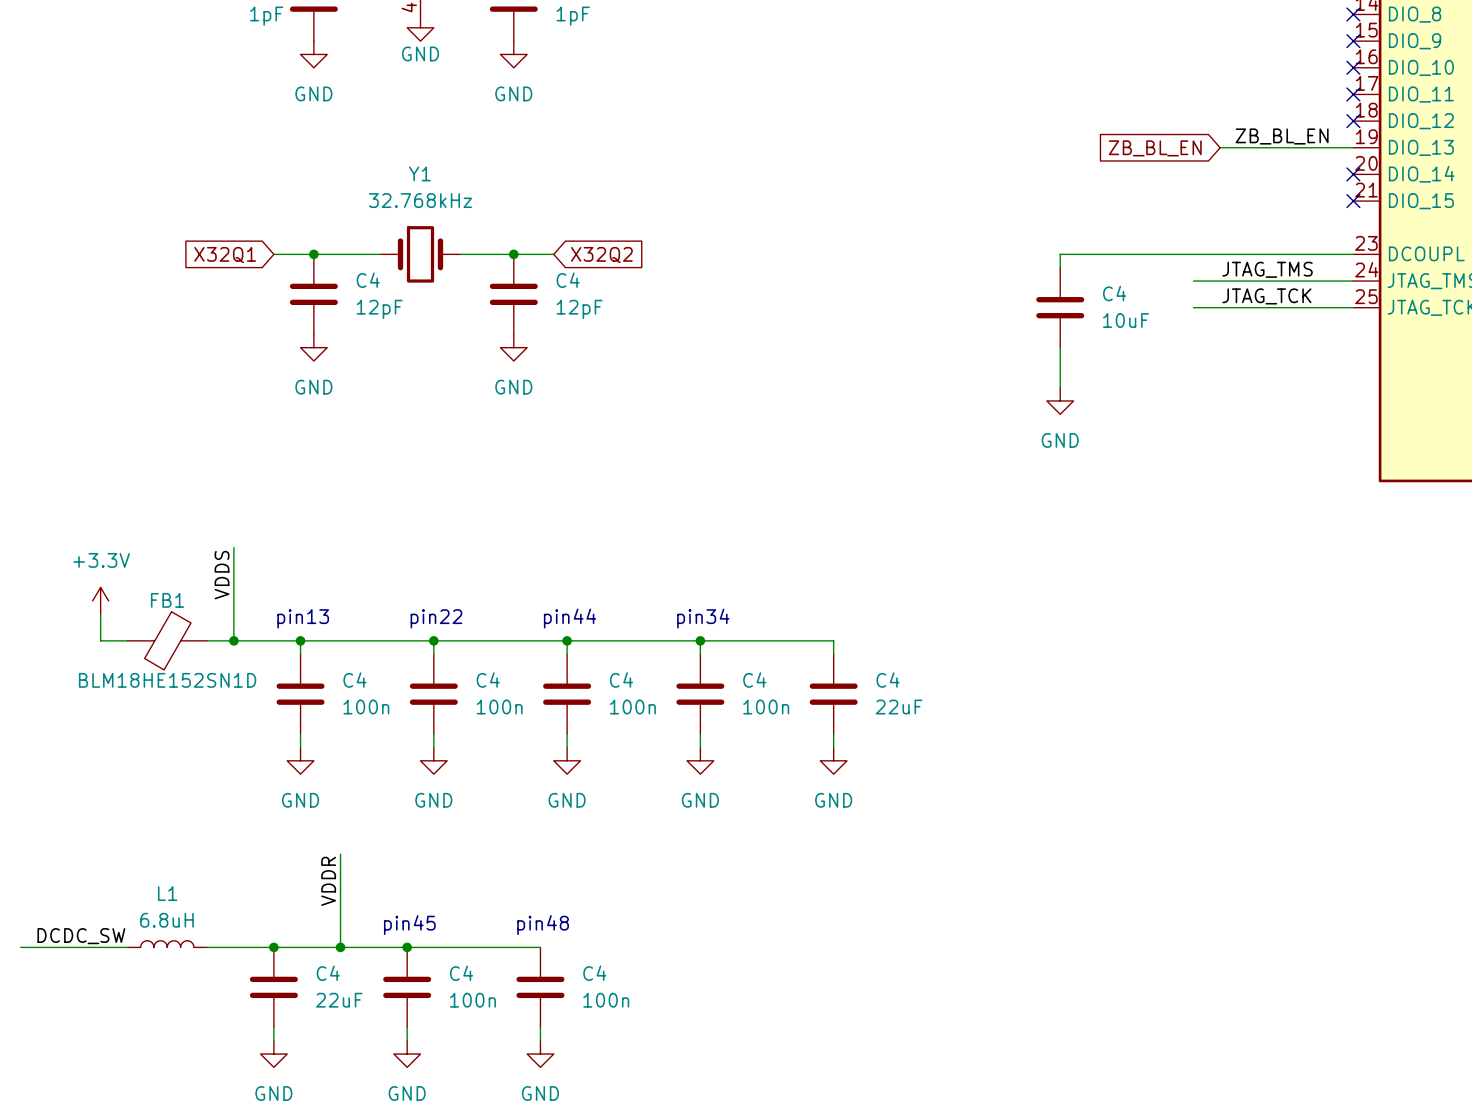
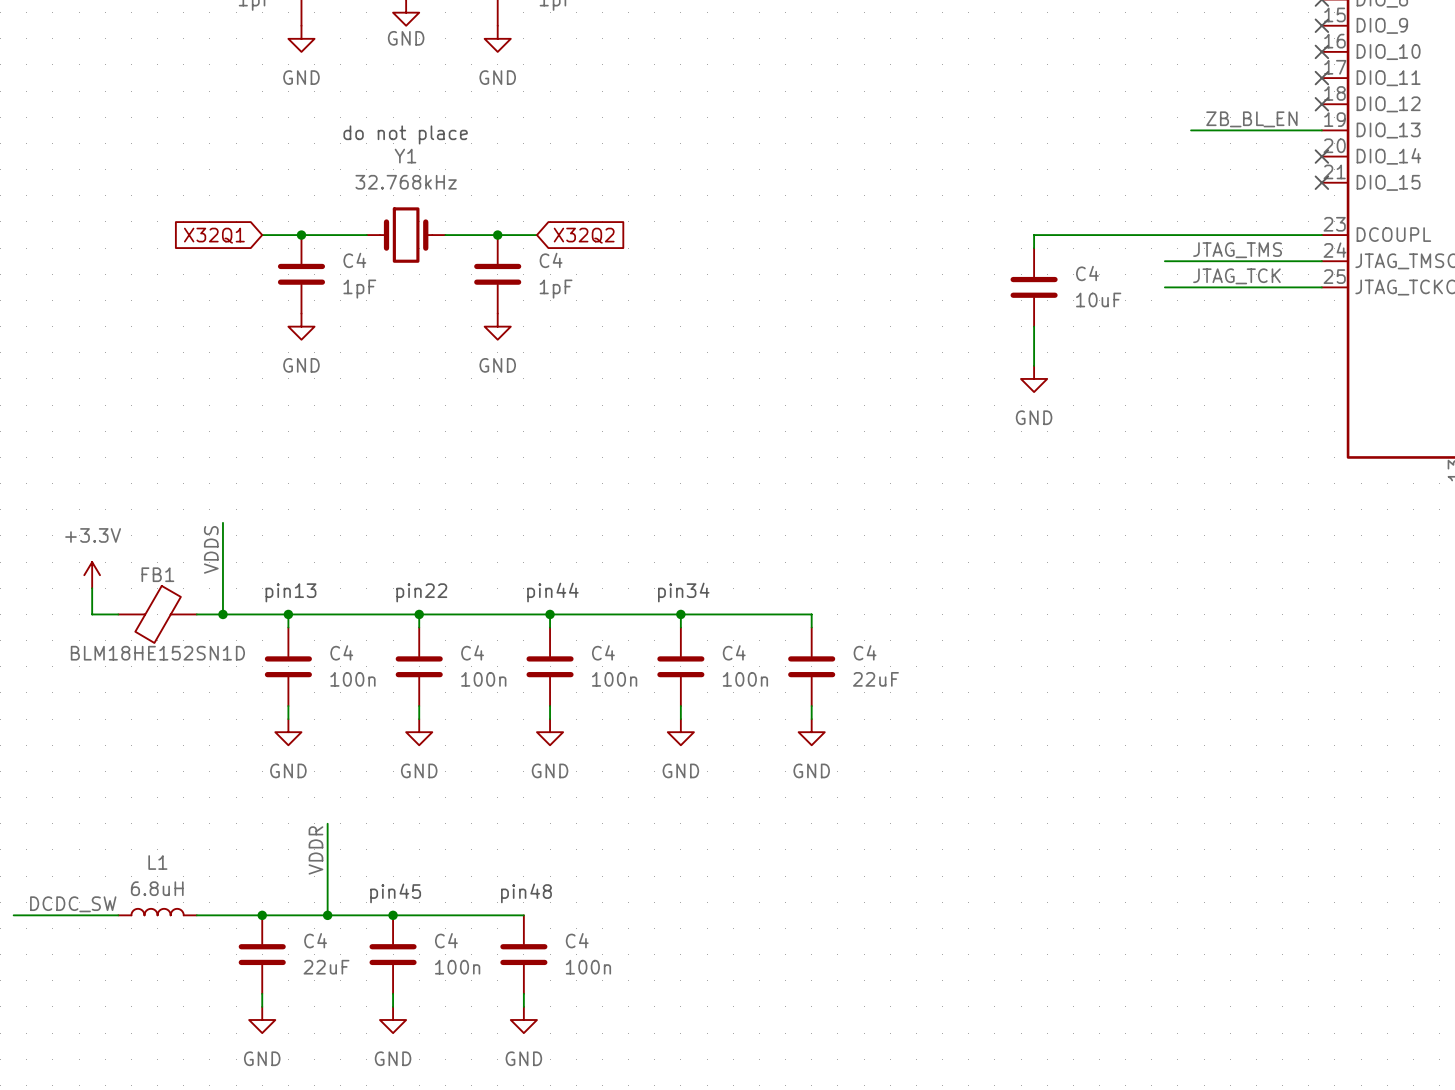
global label: ZB_BL_EN (1155, 148) -> none
text: none -> do not place (405, 134)
C4 value: 12pF (379, 309) -> 1pF (359, 289)
C4 value: 12pF (579, 309) -> 1pF (556, 289)

